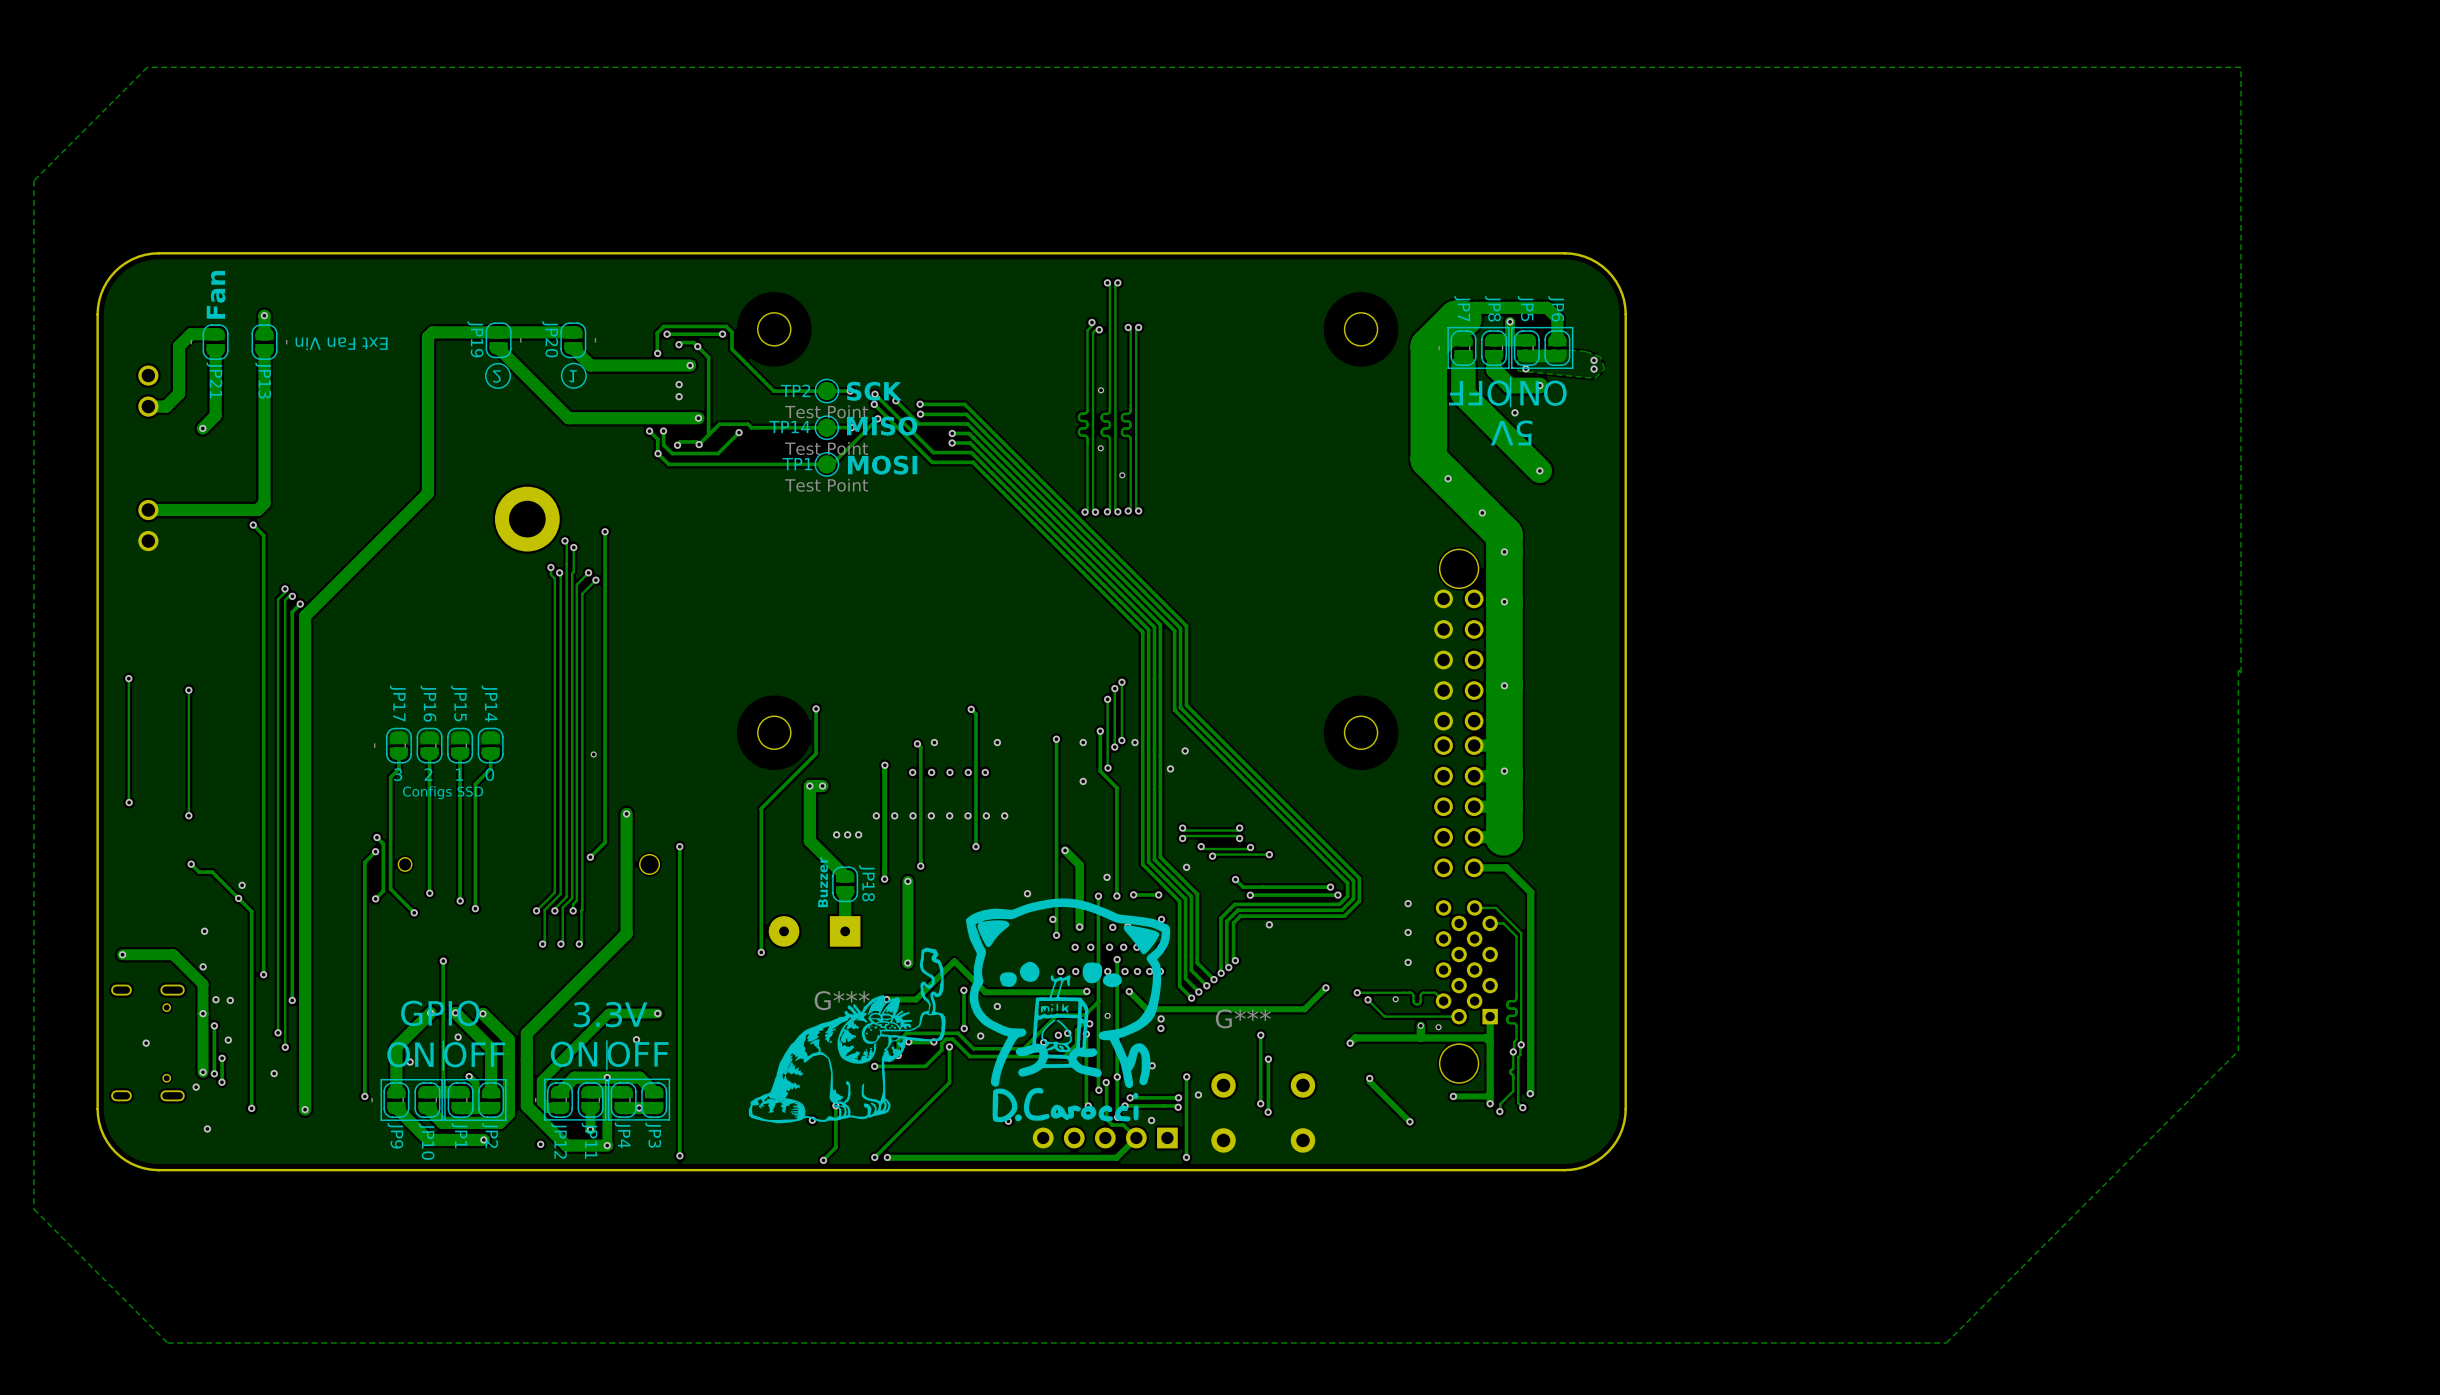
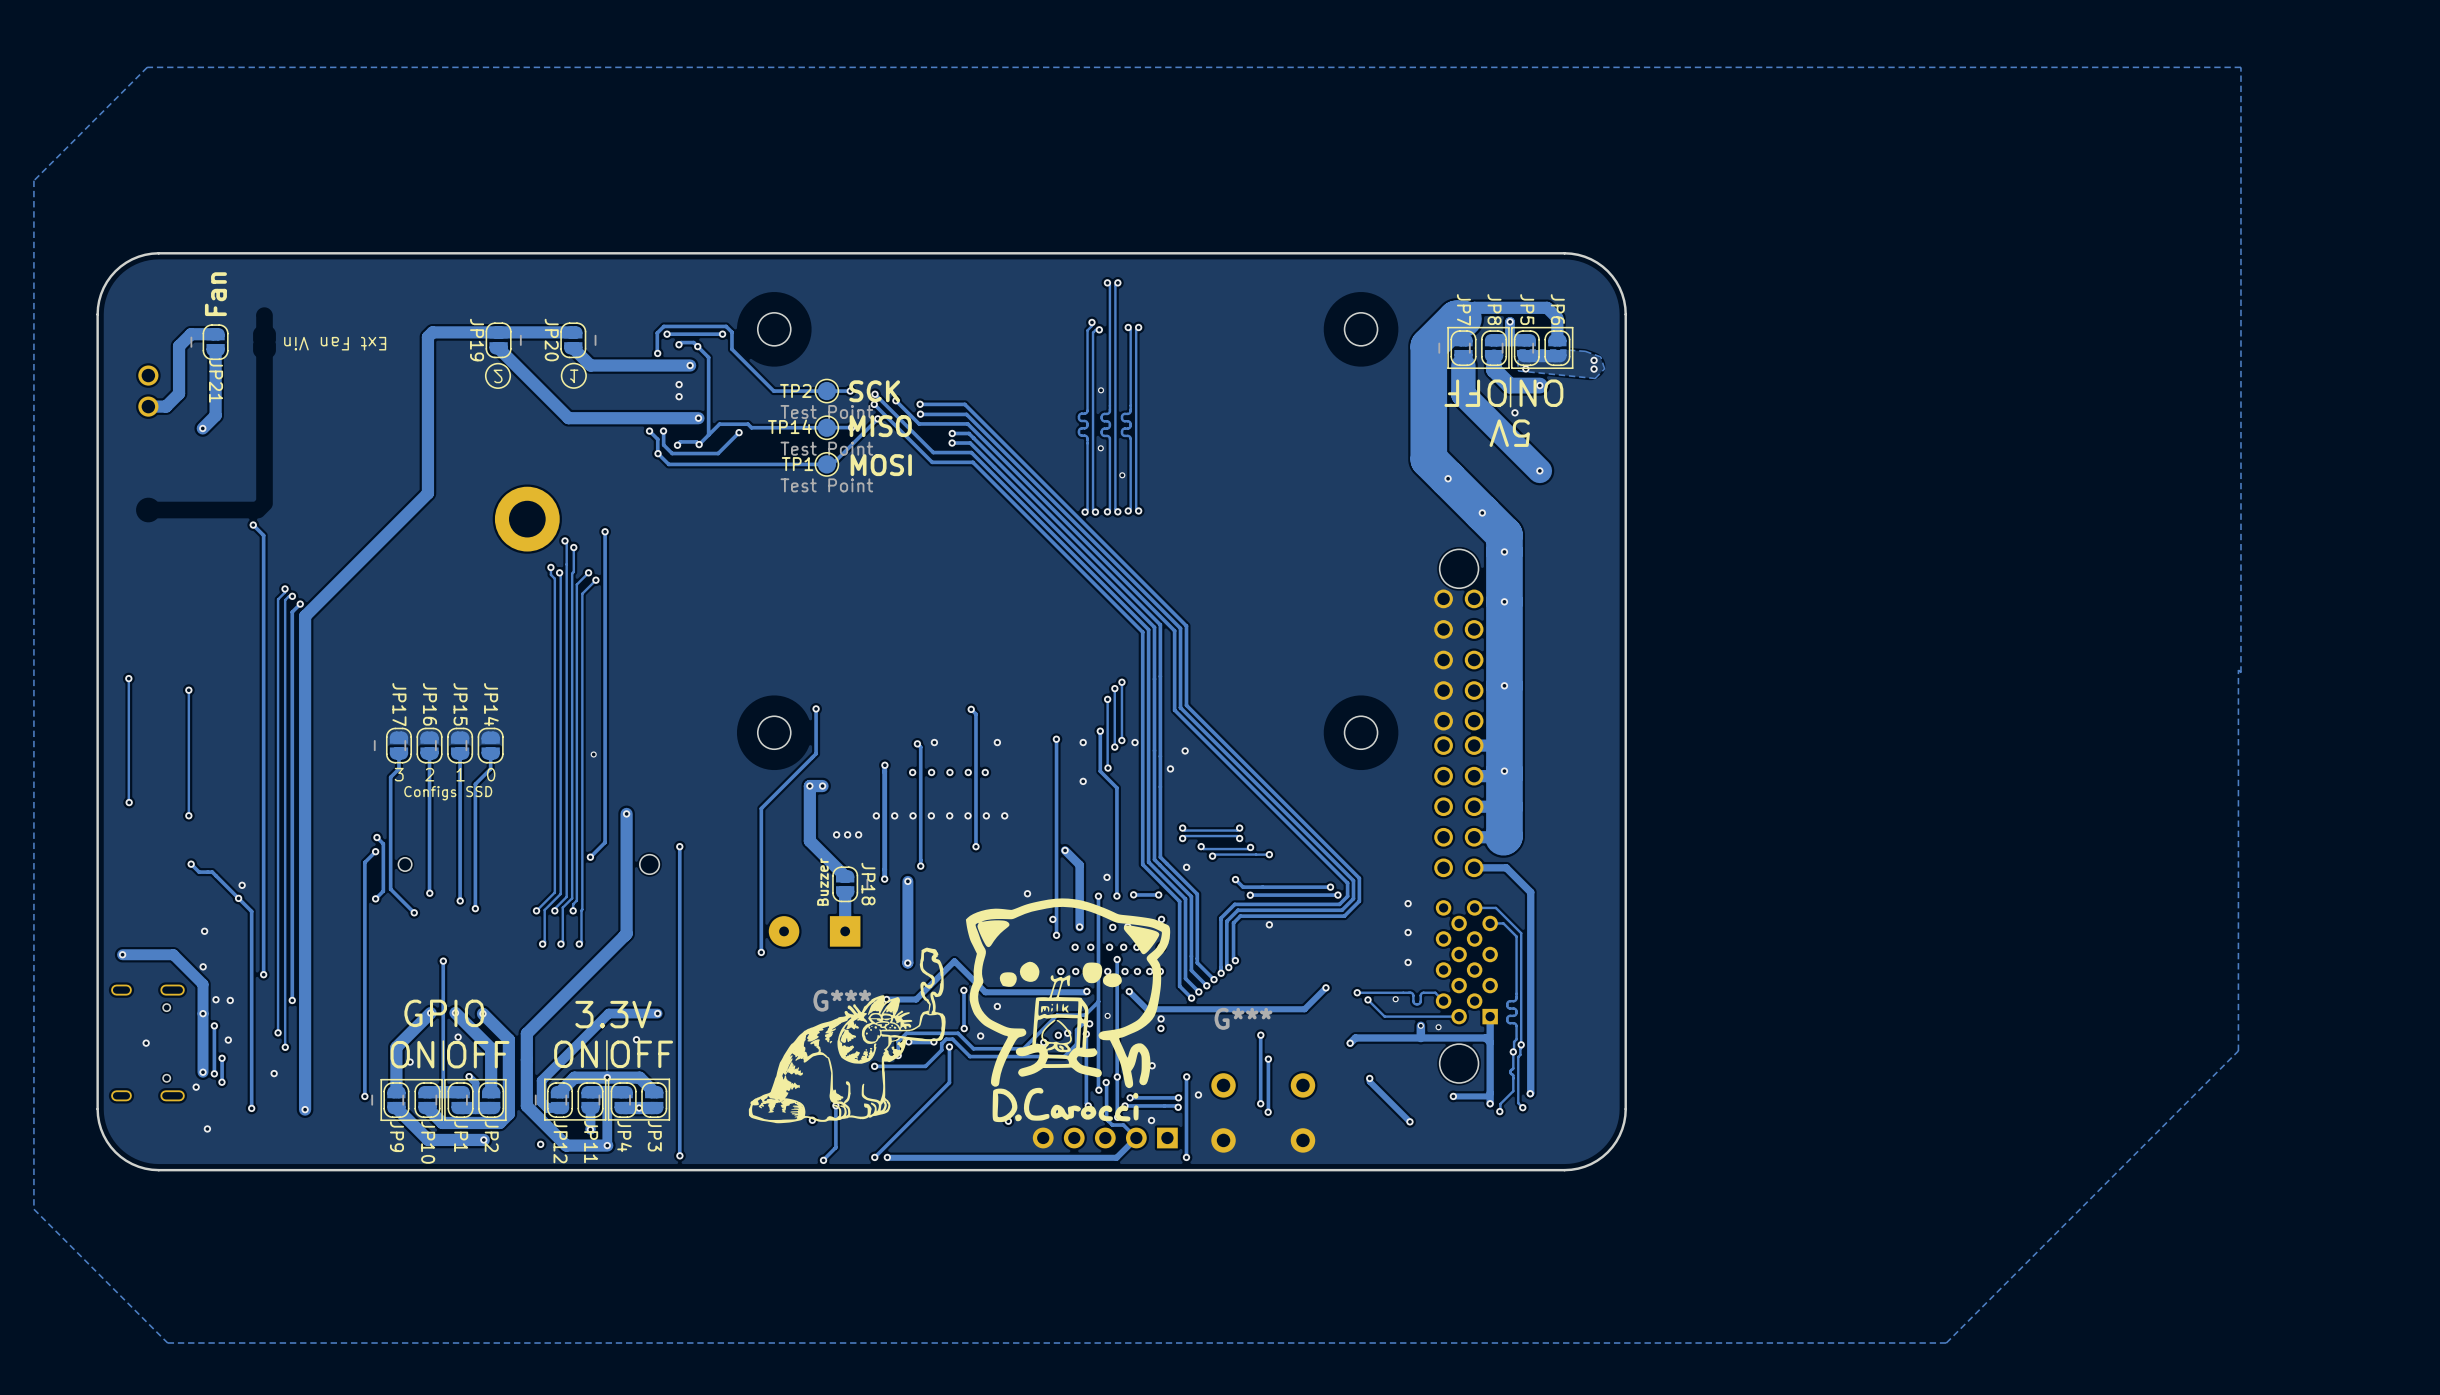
track: (264, 315) (264, 334) -> none
via: (264, 315) -> none
JP13: - (264, 342) -> none
track: (264, 350) (264, 503) (257, 510) (148, 510) -> none
part: (148, 525) -> none

